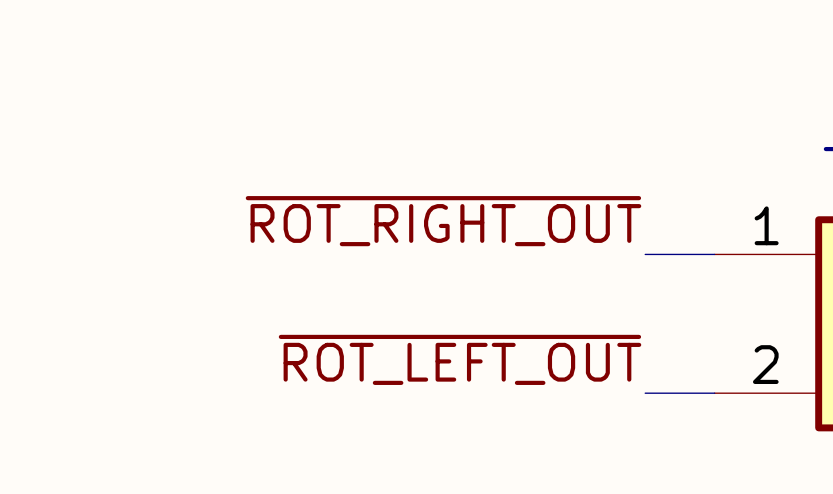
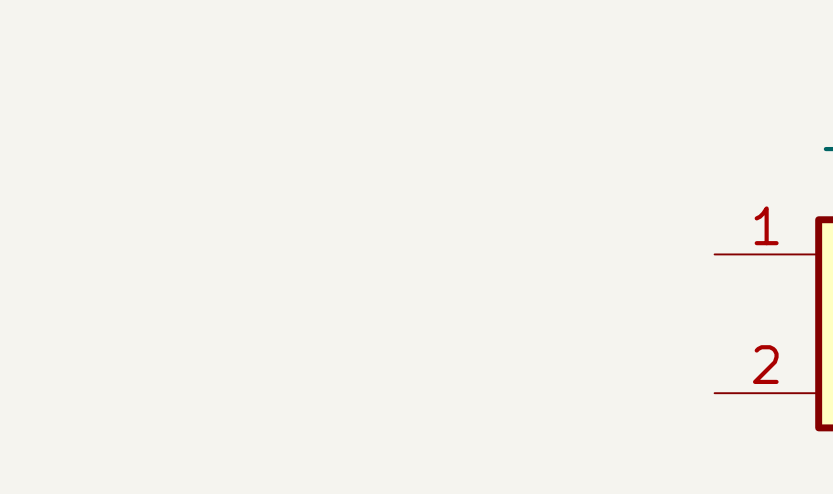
label: ~{ROT_RIGHT_OUT} (443, 221) -> none
wire: (645, 254) (714, 254) -> none
label: ~{ROT_LEFT_OUT} (460, 359) -> none
wire: (645, 393) (714, 393) -> none

